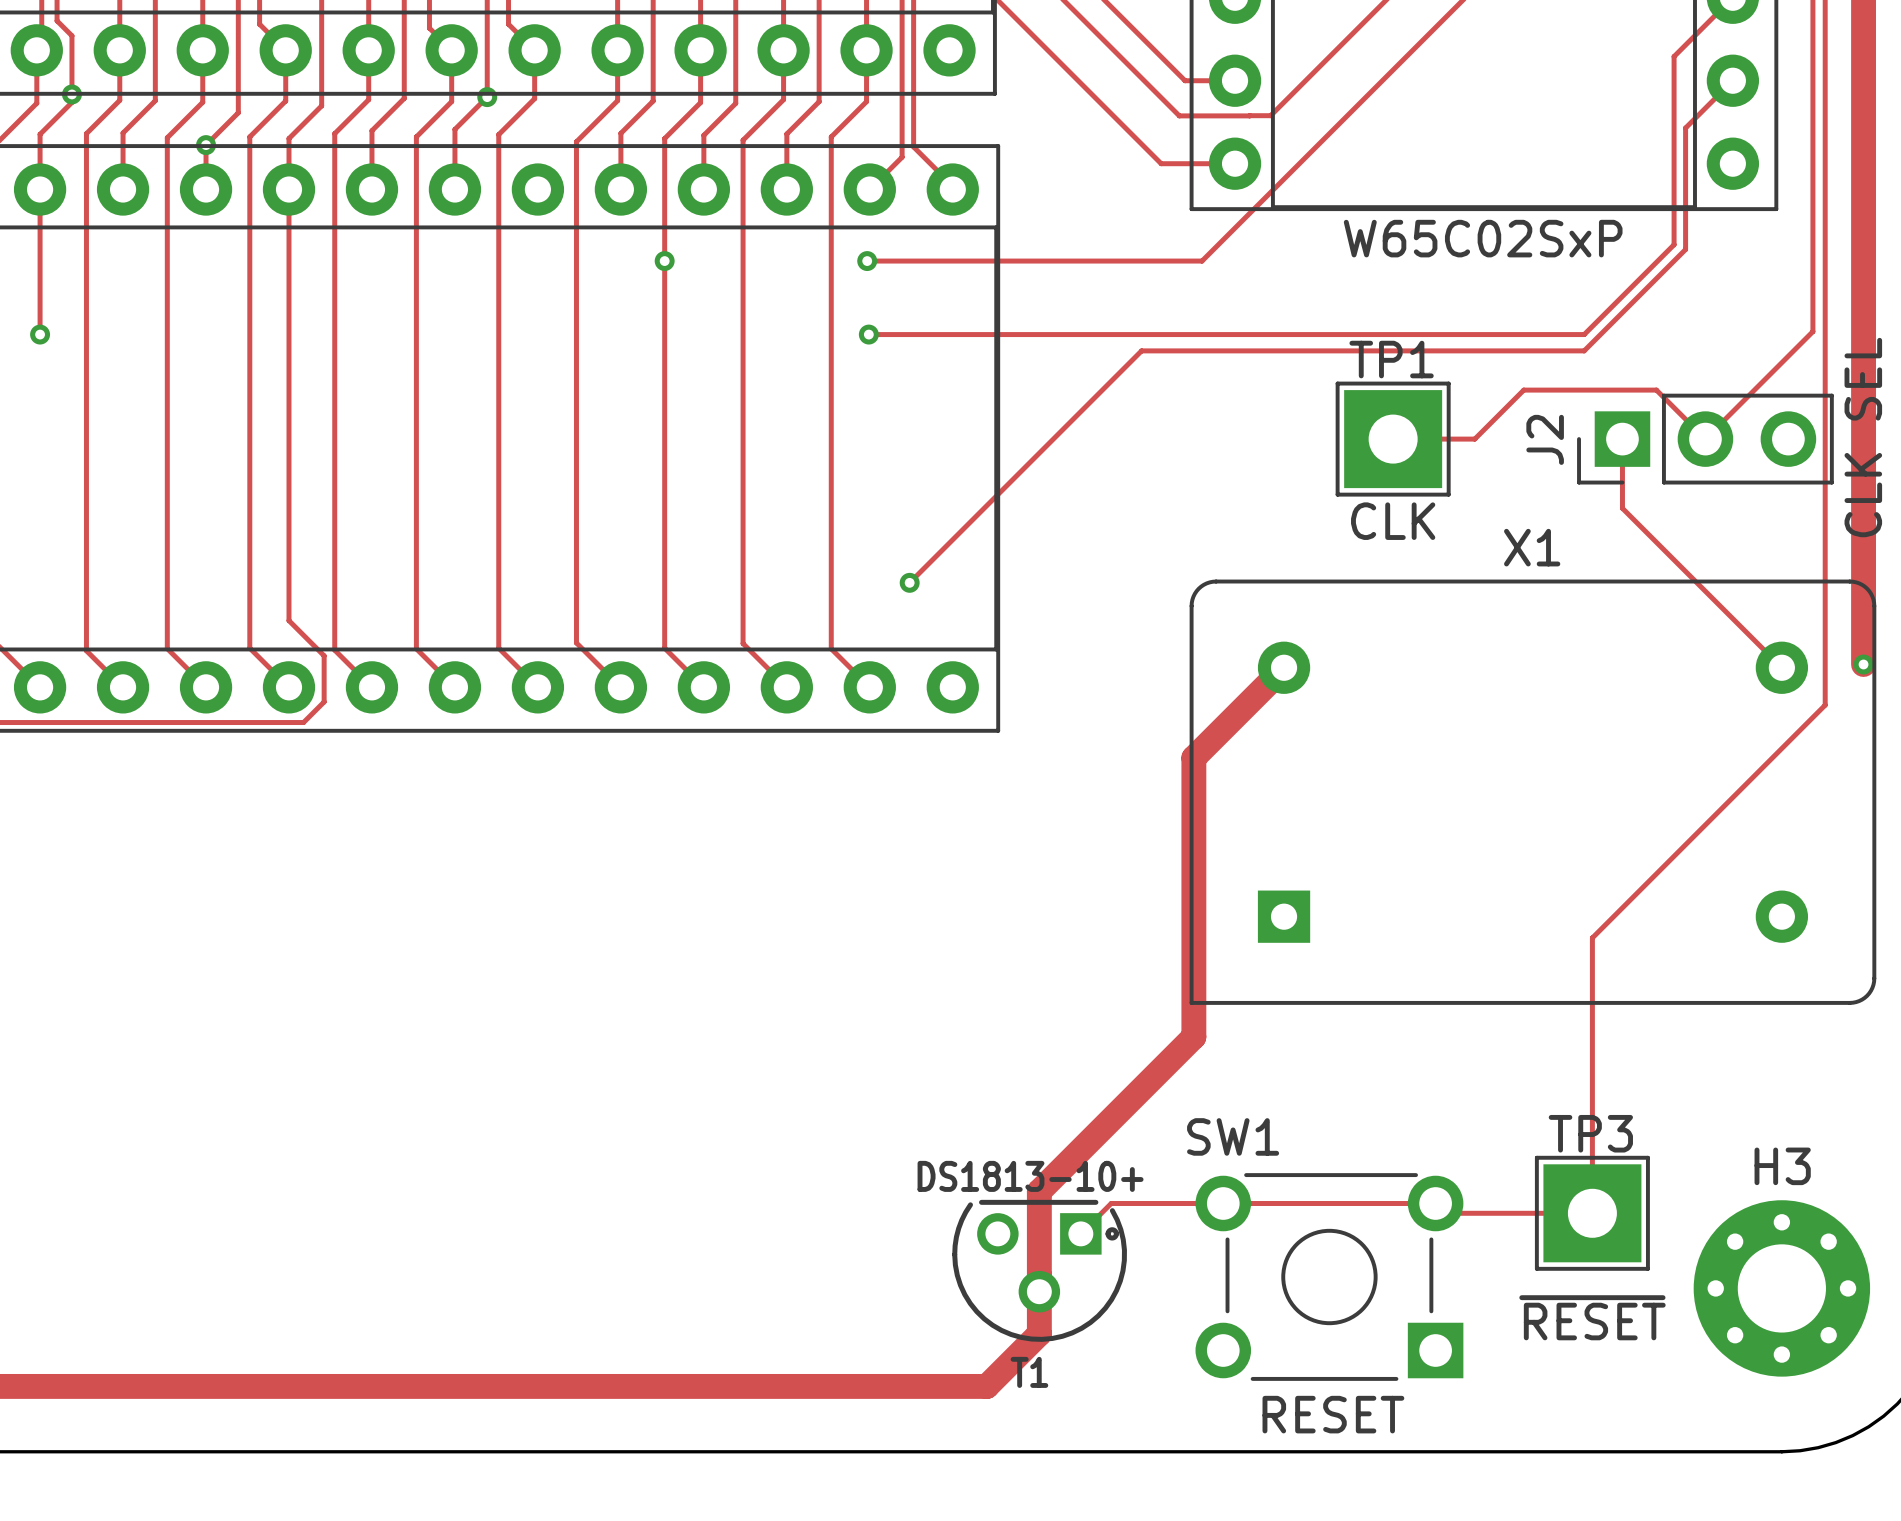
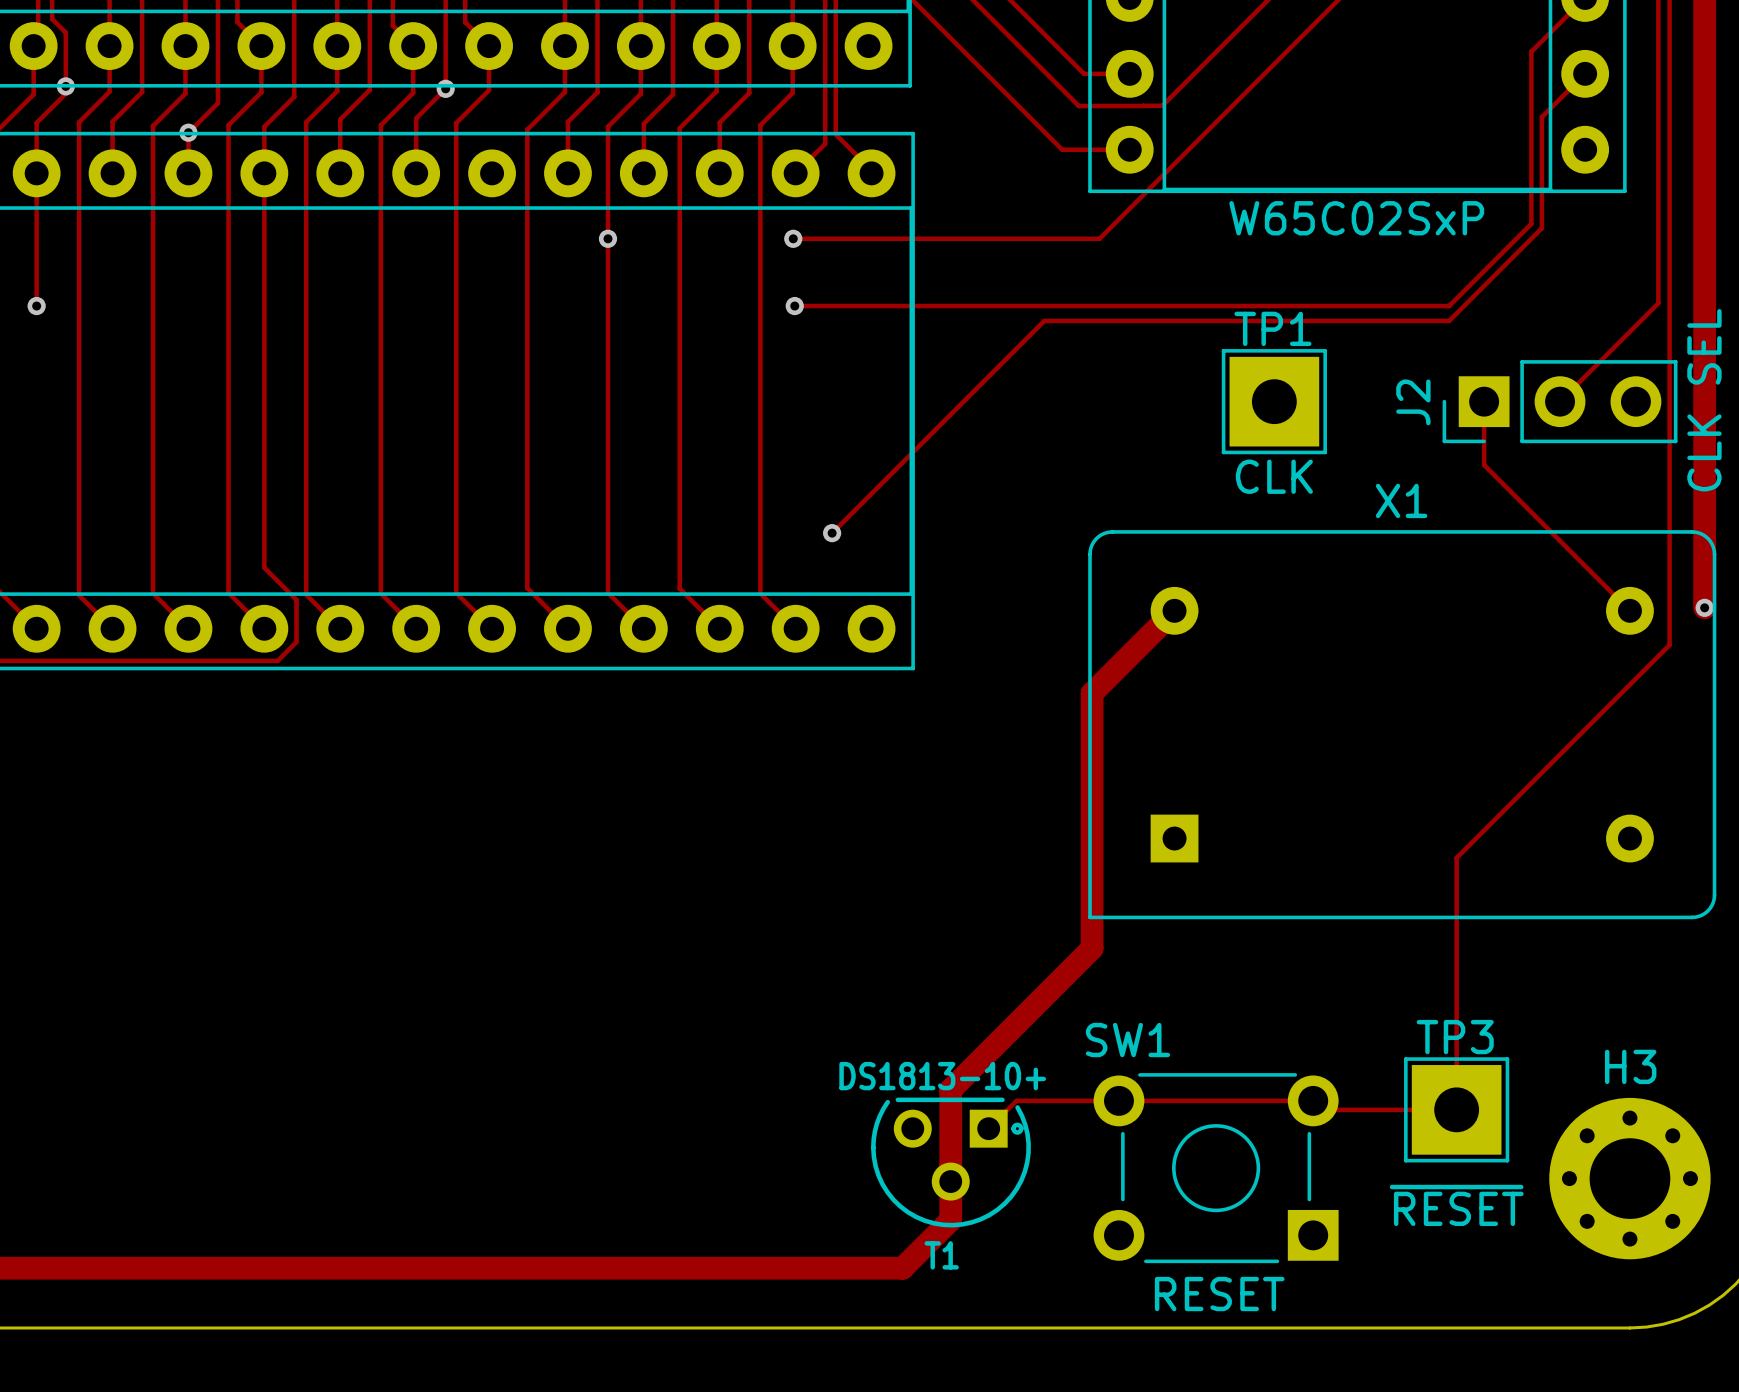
track: (1393, 439) (1474, 439) (1523, 390) (1656, 390) (1705, 439) -> none

